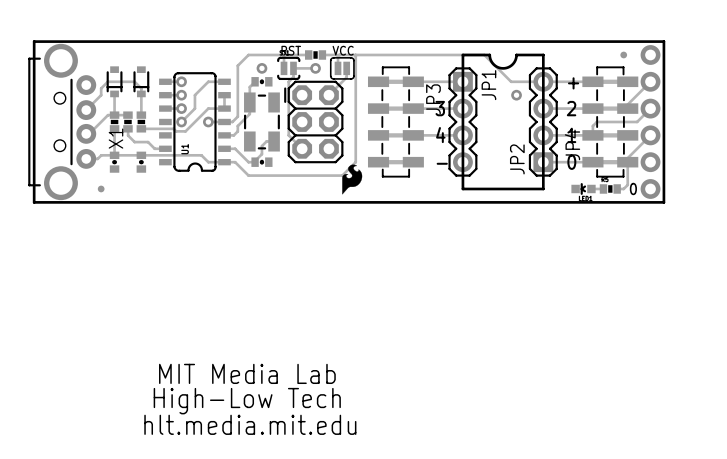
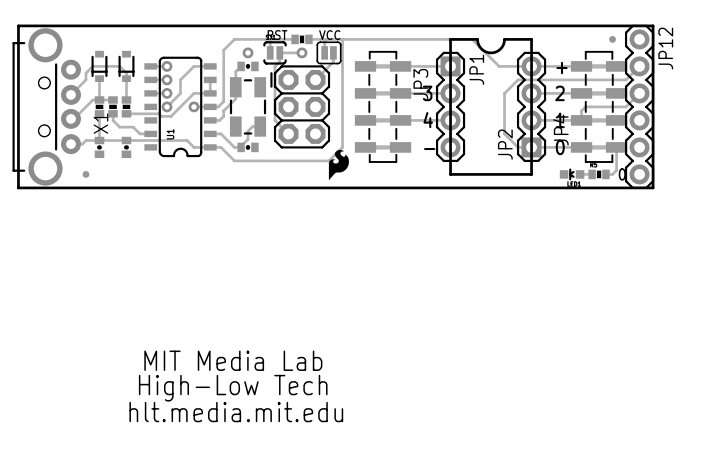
via: (516, 95) -> none
track: (637, 95) (627, 104) (627, 108) -> (626, 79) (518, 79) (504, 93) (504, 133) (518, 147) (531, 147)
part: (650, 121) -> none
JP12: none -> (639, 106)
track: (650, 135) (627, 158) -> none

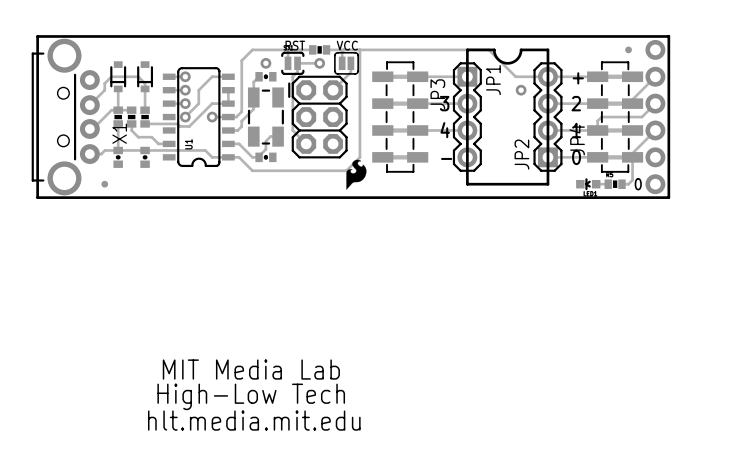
via: none -> (521, 90)
track: (626, 79) (518, 79) (504, 93) (504, 133) (518, 147) (531, 147) -> (641, 90) (632, 99) (632, 103)
JP12: (639, 106) -> none
part: none -> (655, 117)
track: none -> (655, 130) (632, 153)

